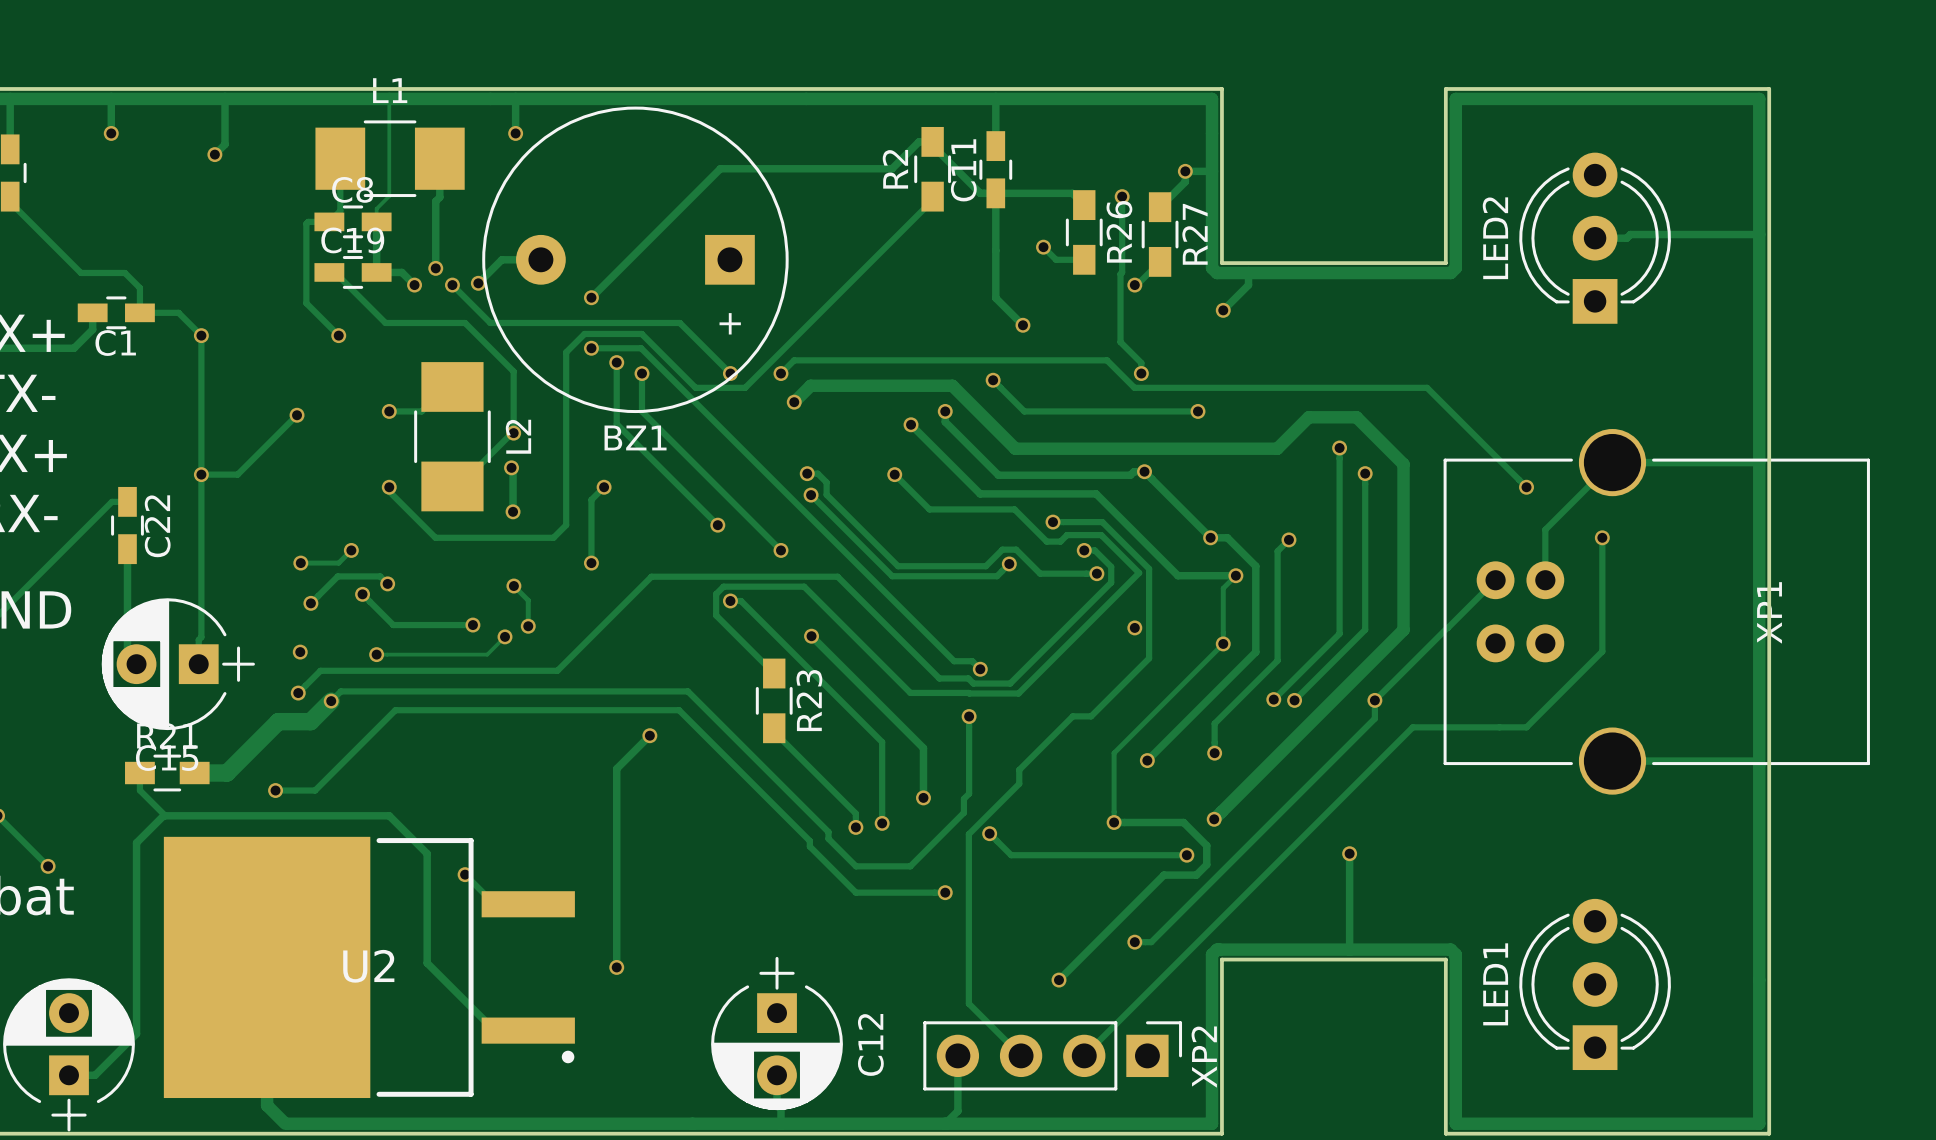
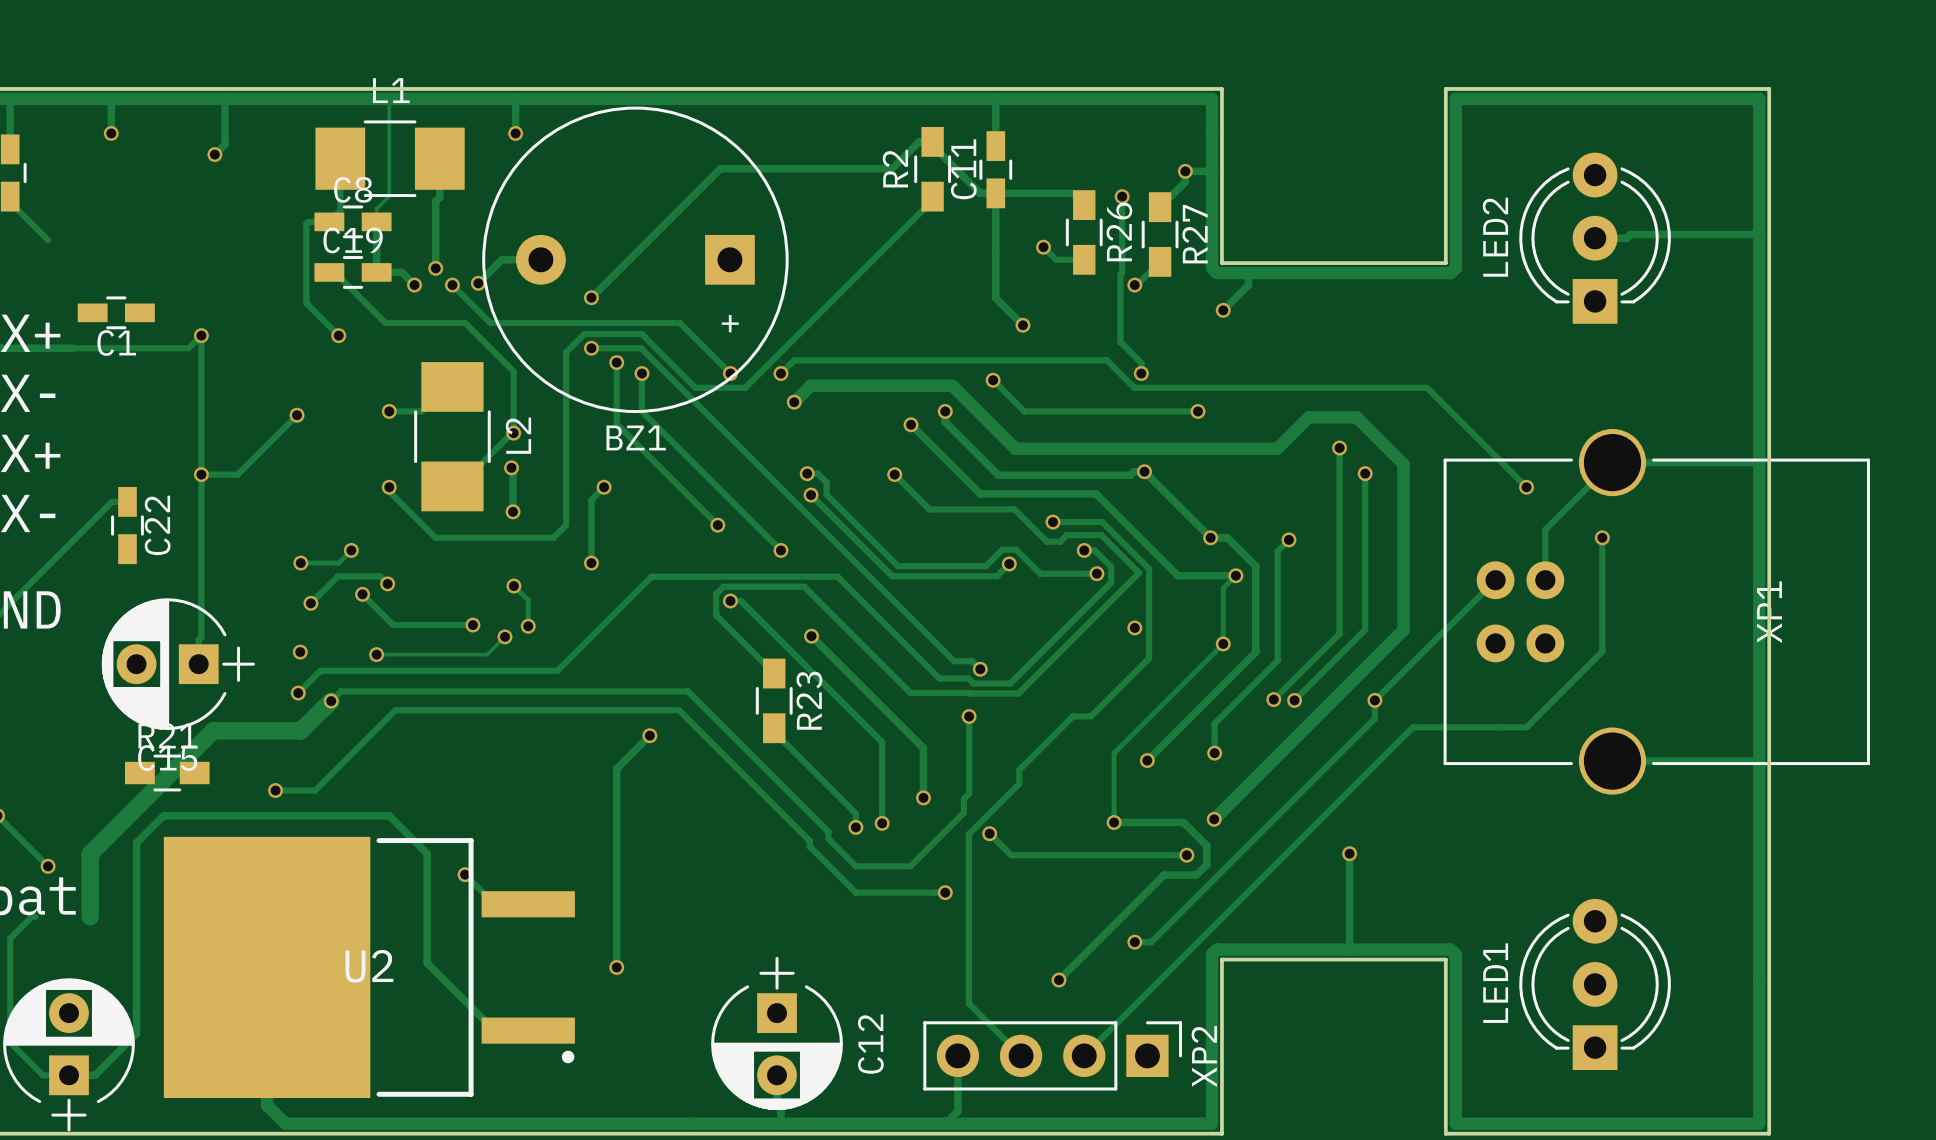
track: (48, 240) (80, 272) (124, 272) (139, 287) (139, 312) (178, 312) (201, 335) -> none
track: (92, 312) (92, 329) (74, 348) -> (201, 335) (188, 348) (74, 348)
track: (127, 549) (127, 655) (136, 664) -> none
track: (323, 708) (310, 721) (278, 721) (226, 773) (194, 773) -> (323, 708) (300, 730) (213, 730) (90, 854) (90, 916)
track: (139, 773) (139, 790) (164, 815) -> none
track: none -> (35, 916) (31, 916) (10, 938) (10, 1042) (42, 1075) (68, 1075)

